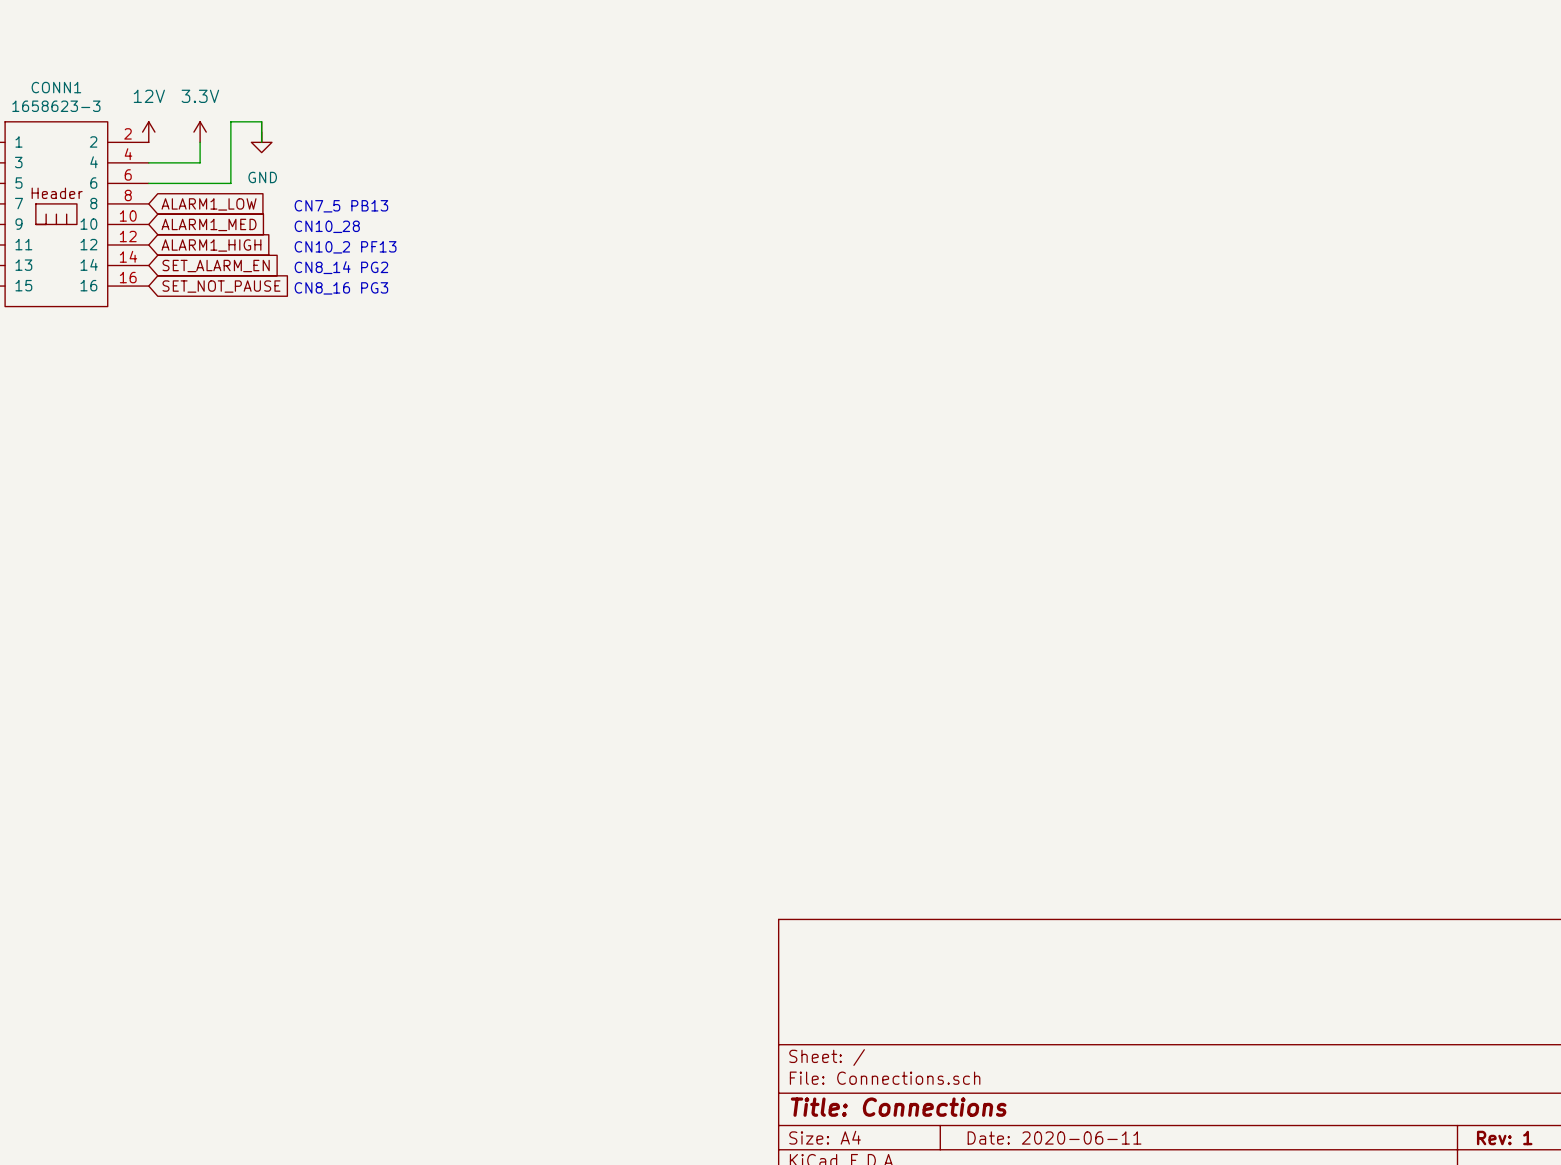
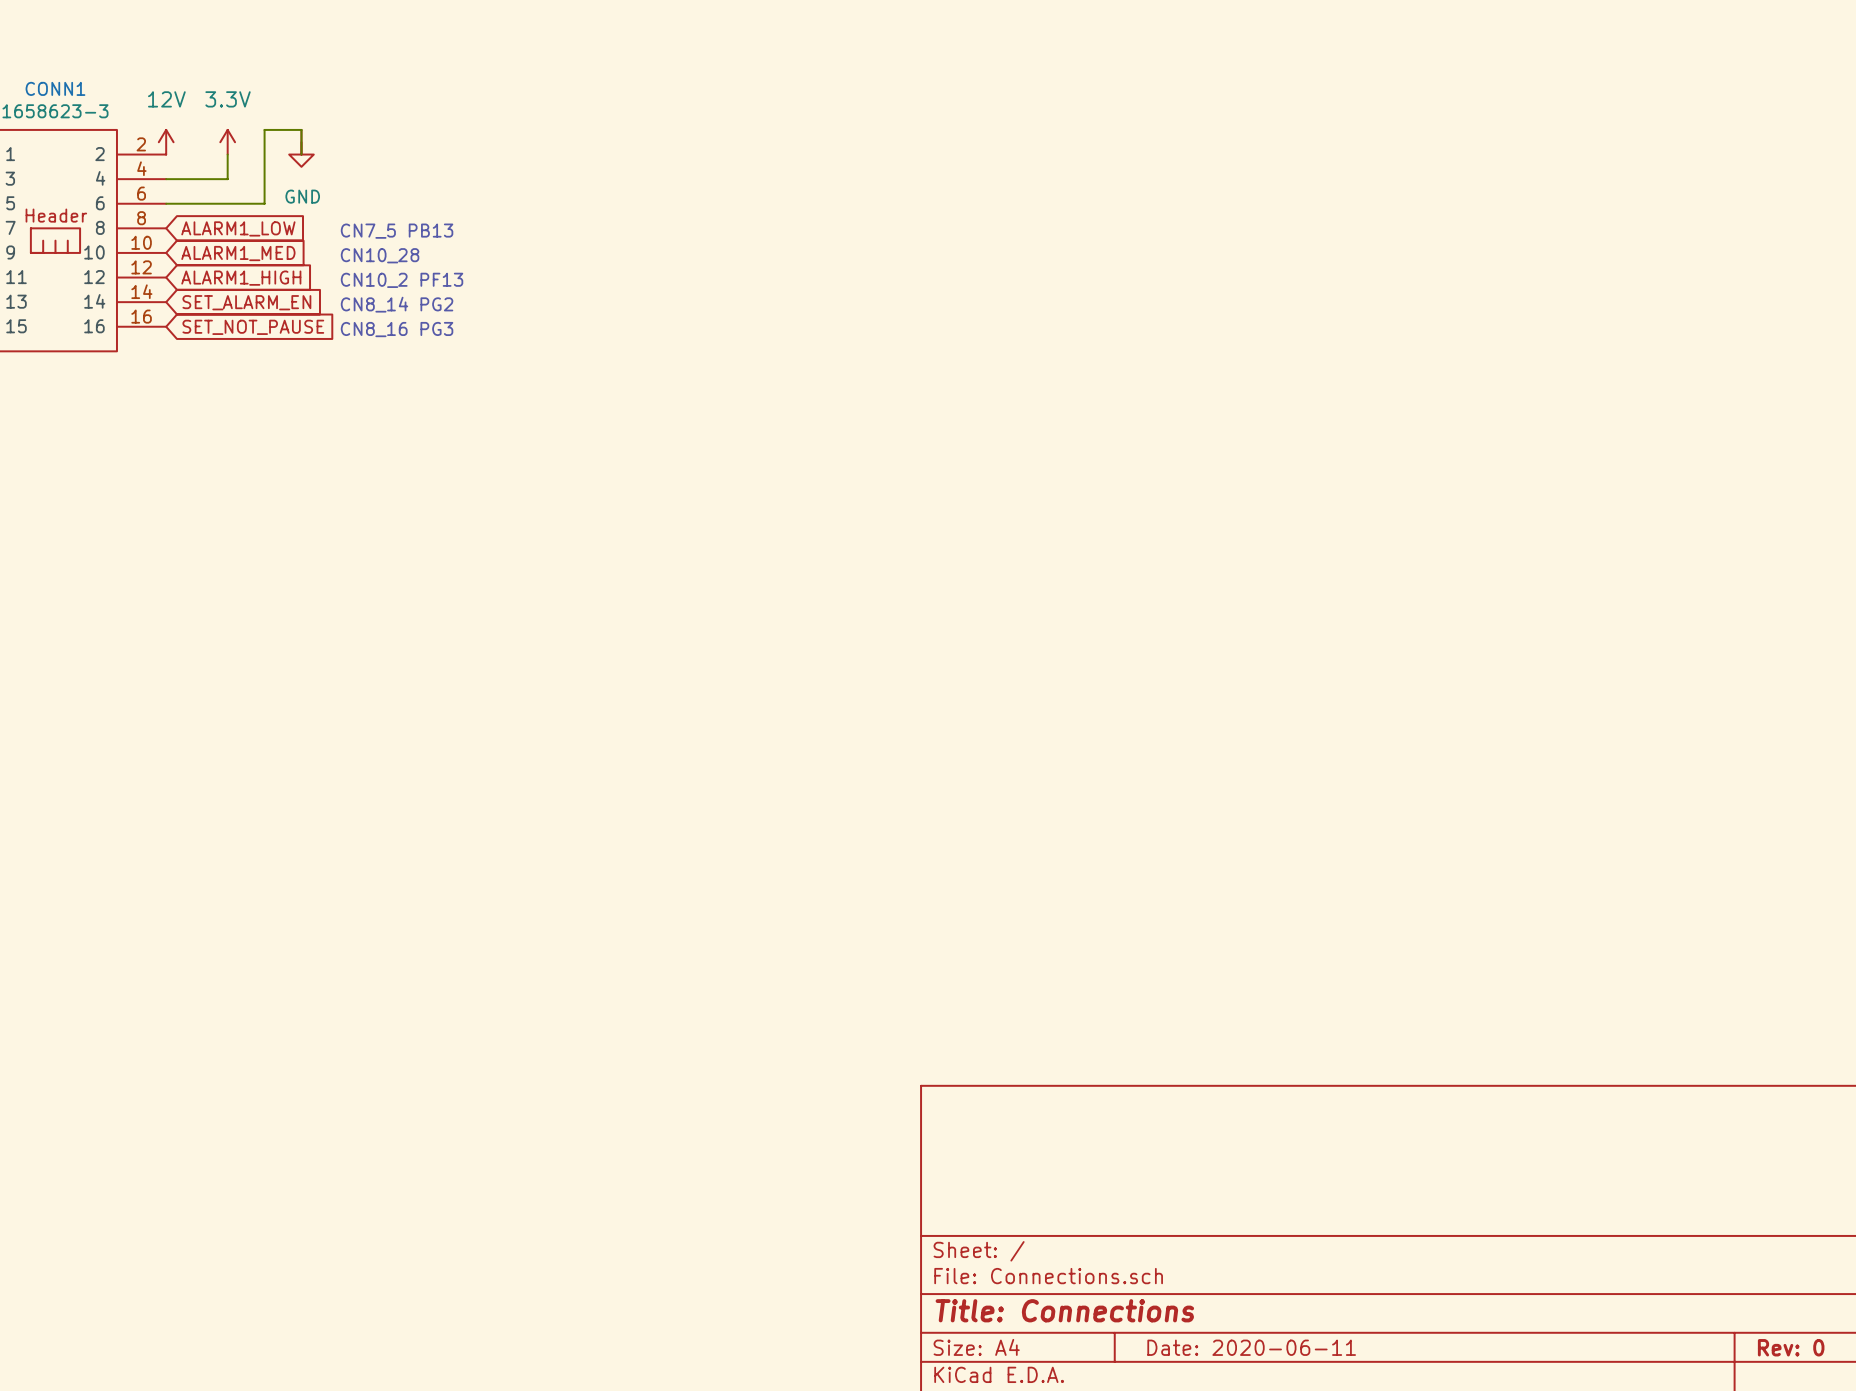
title block: Rev: 1 (1504, 1137) -> Rev: 0 (1791, 1347)

